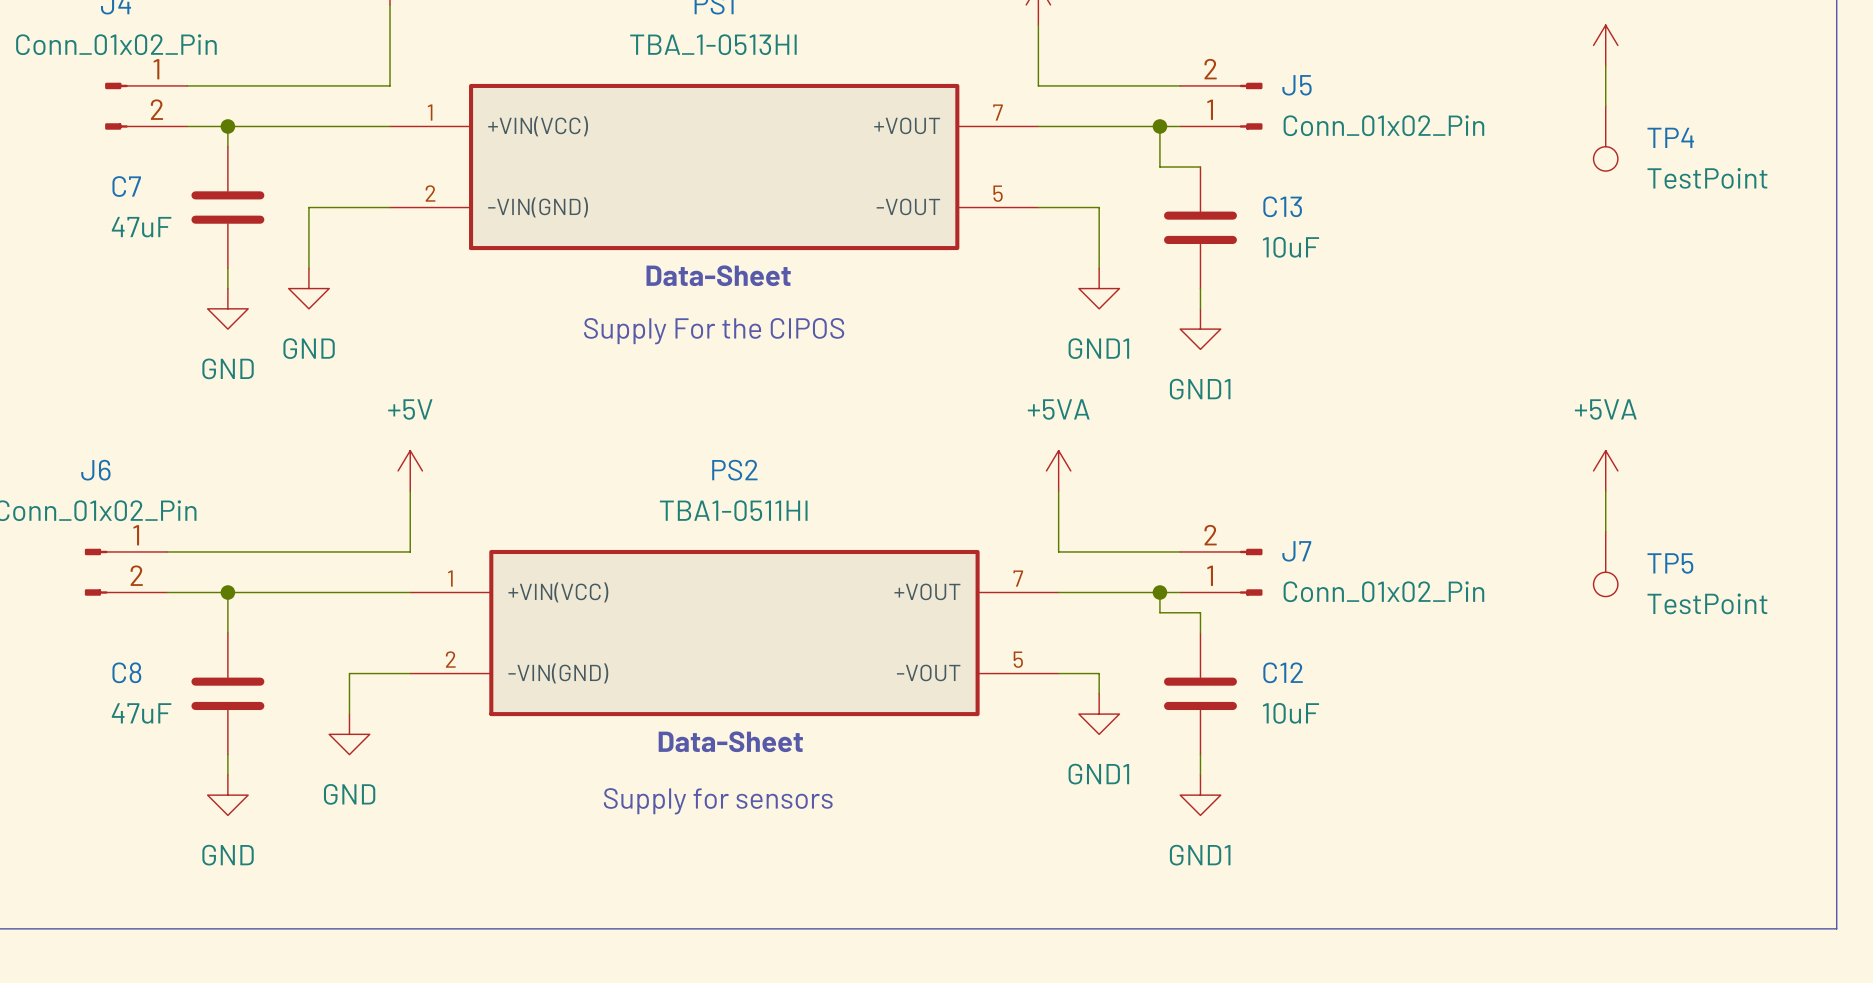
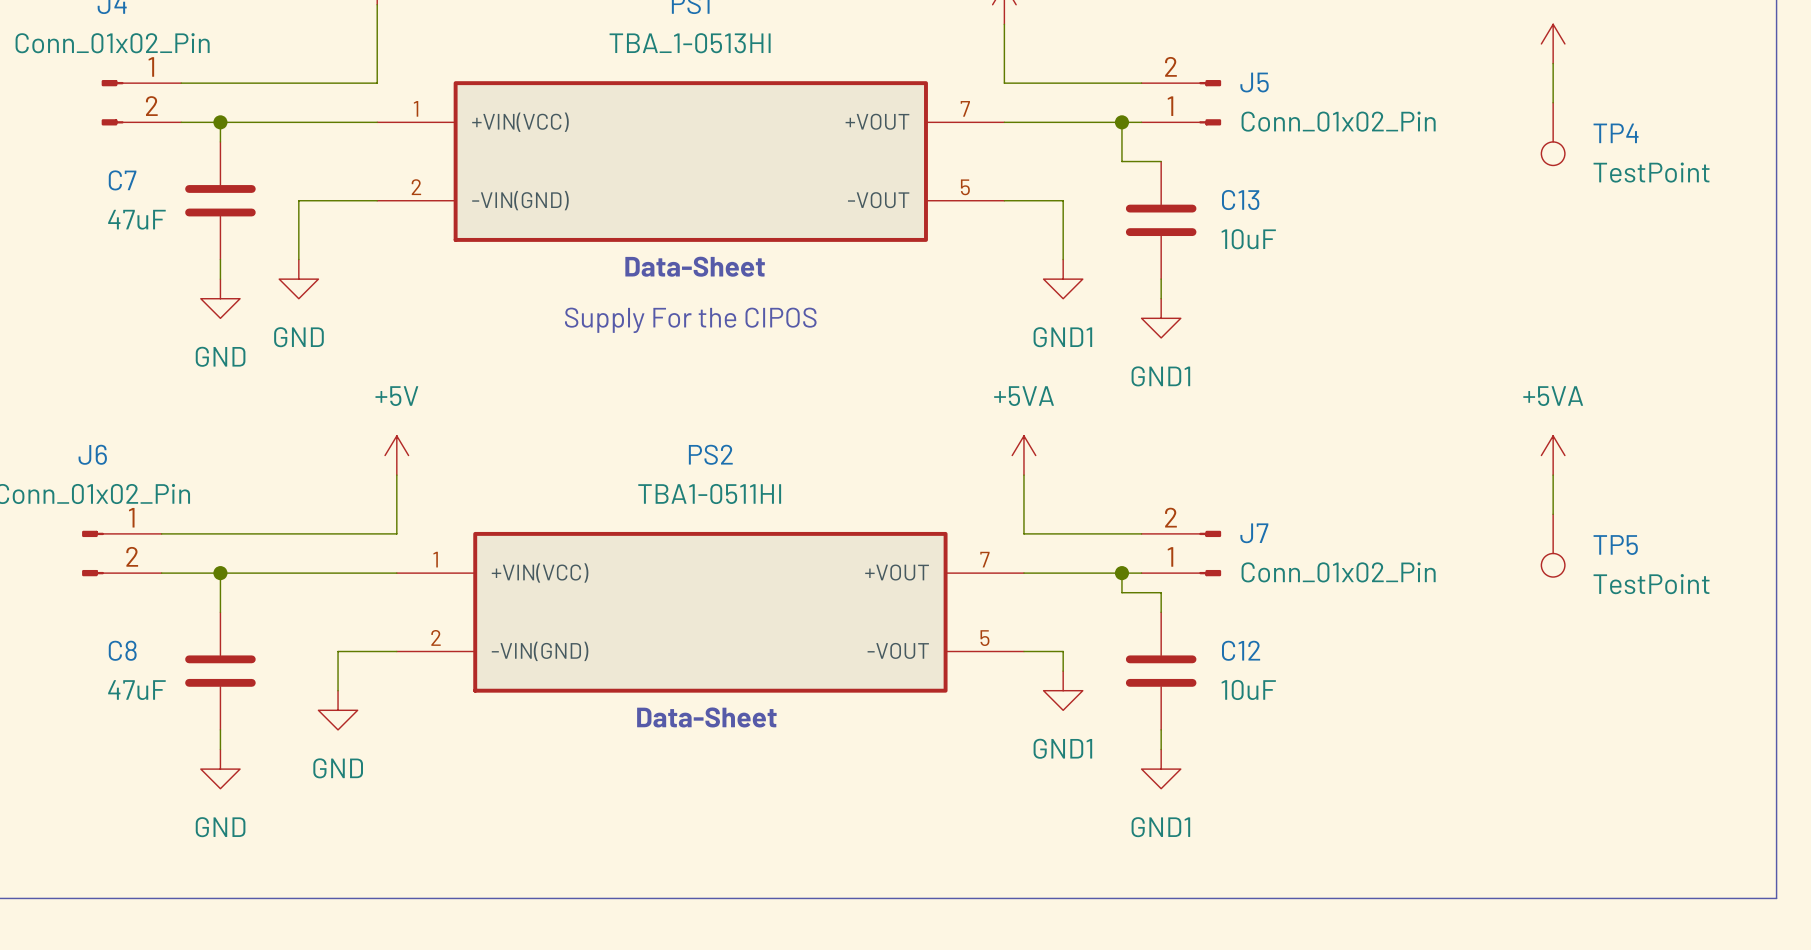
text: Supply for sensors (718, 801) -> none

